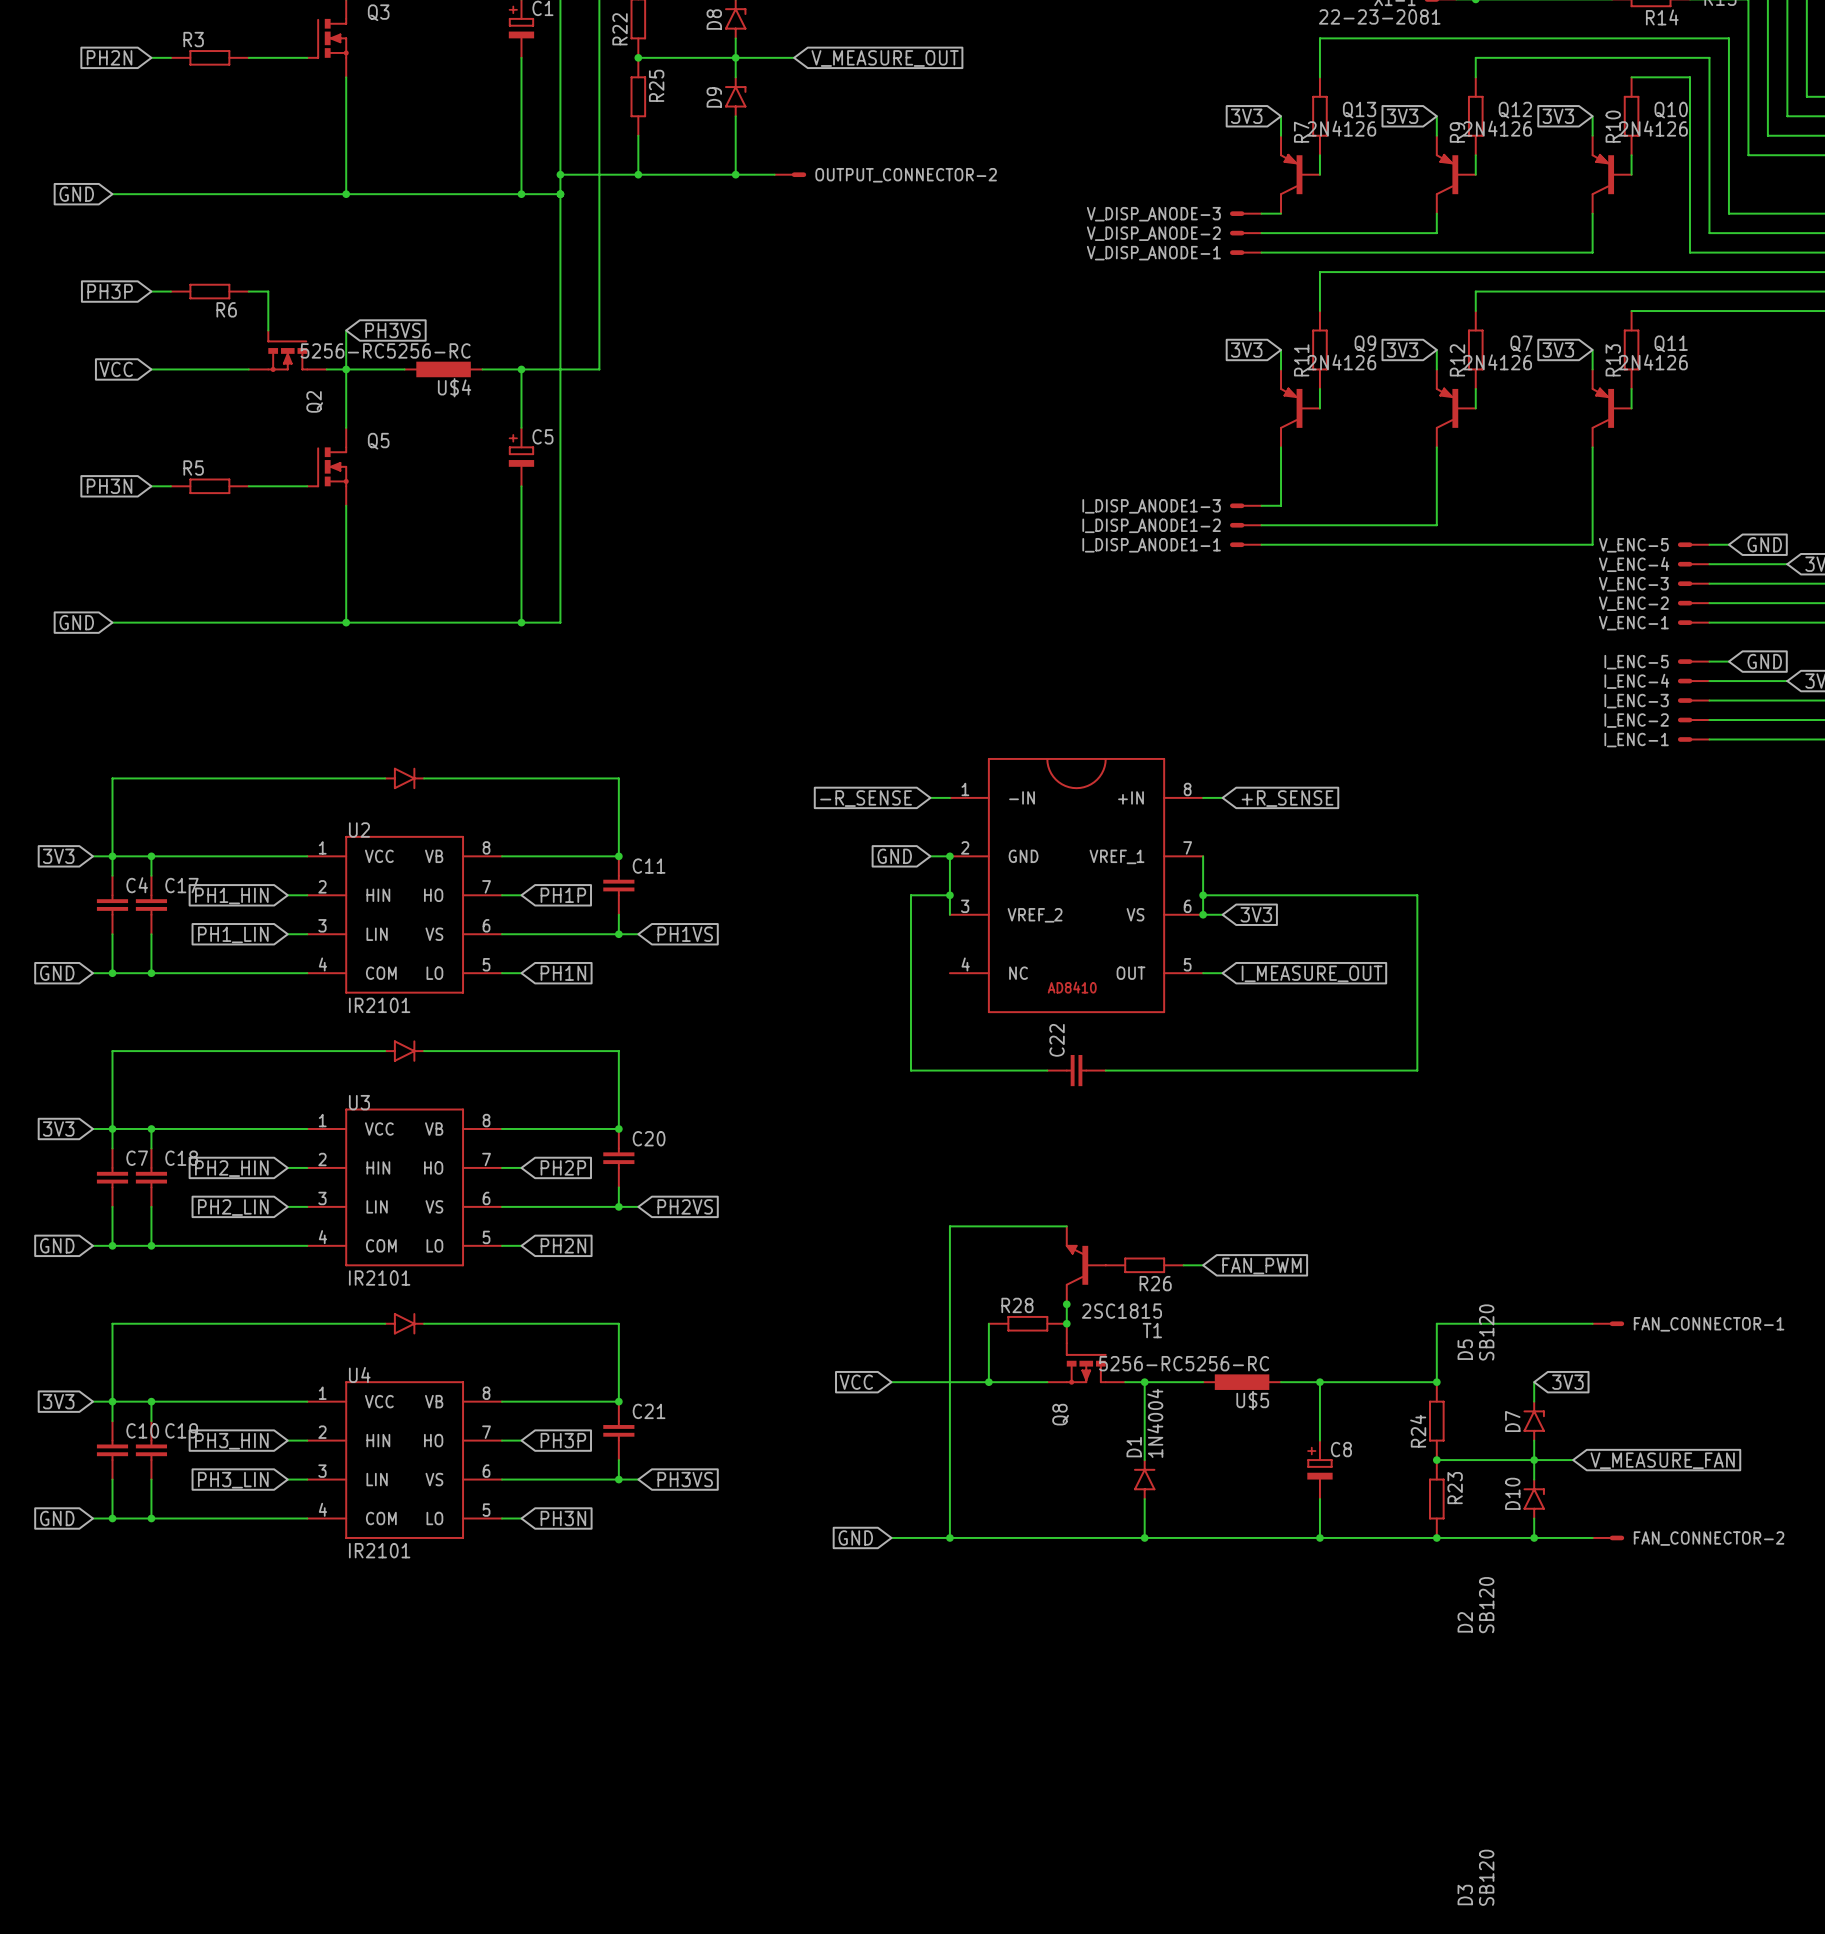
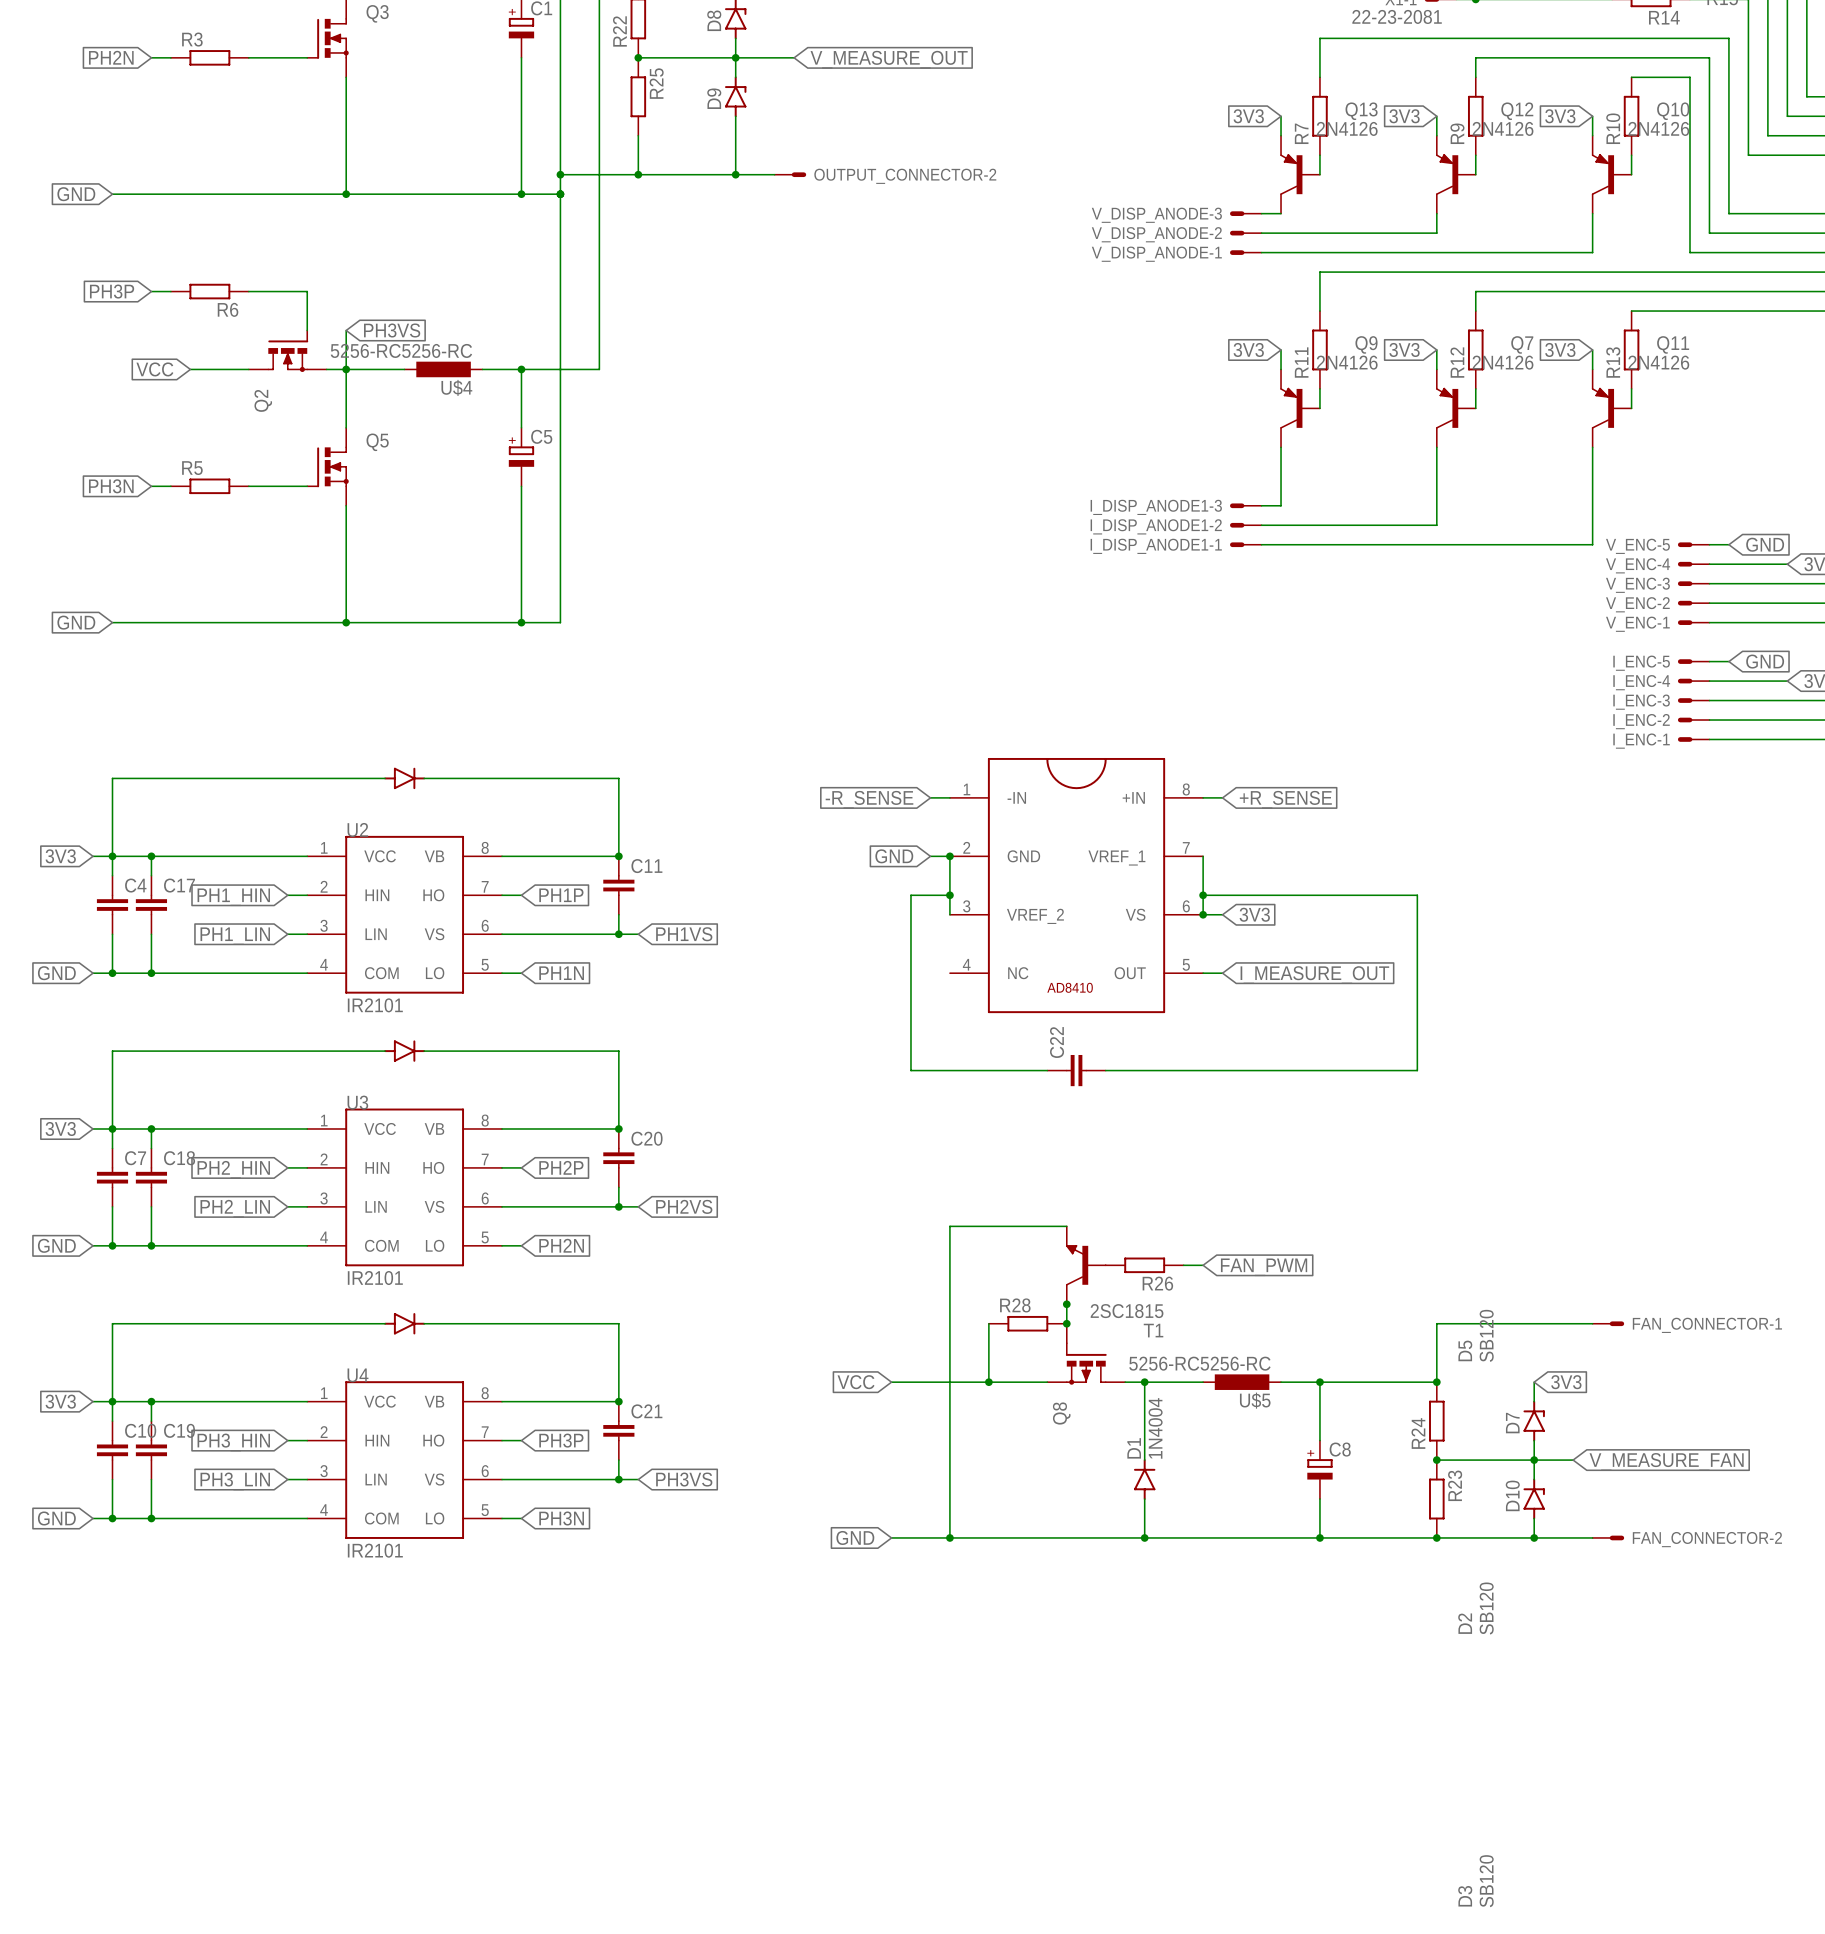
wire: (268, 291) (268, 330) -> (268, 291) (307, 291) (307, 330)
Q2 flip: as is (287, 350) -> left-right (287, 350)
global label position: VCC (116, 369) -> VCC (154, 369)
wire: (151, 369) (190, 369) -> none

